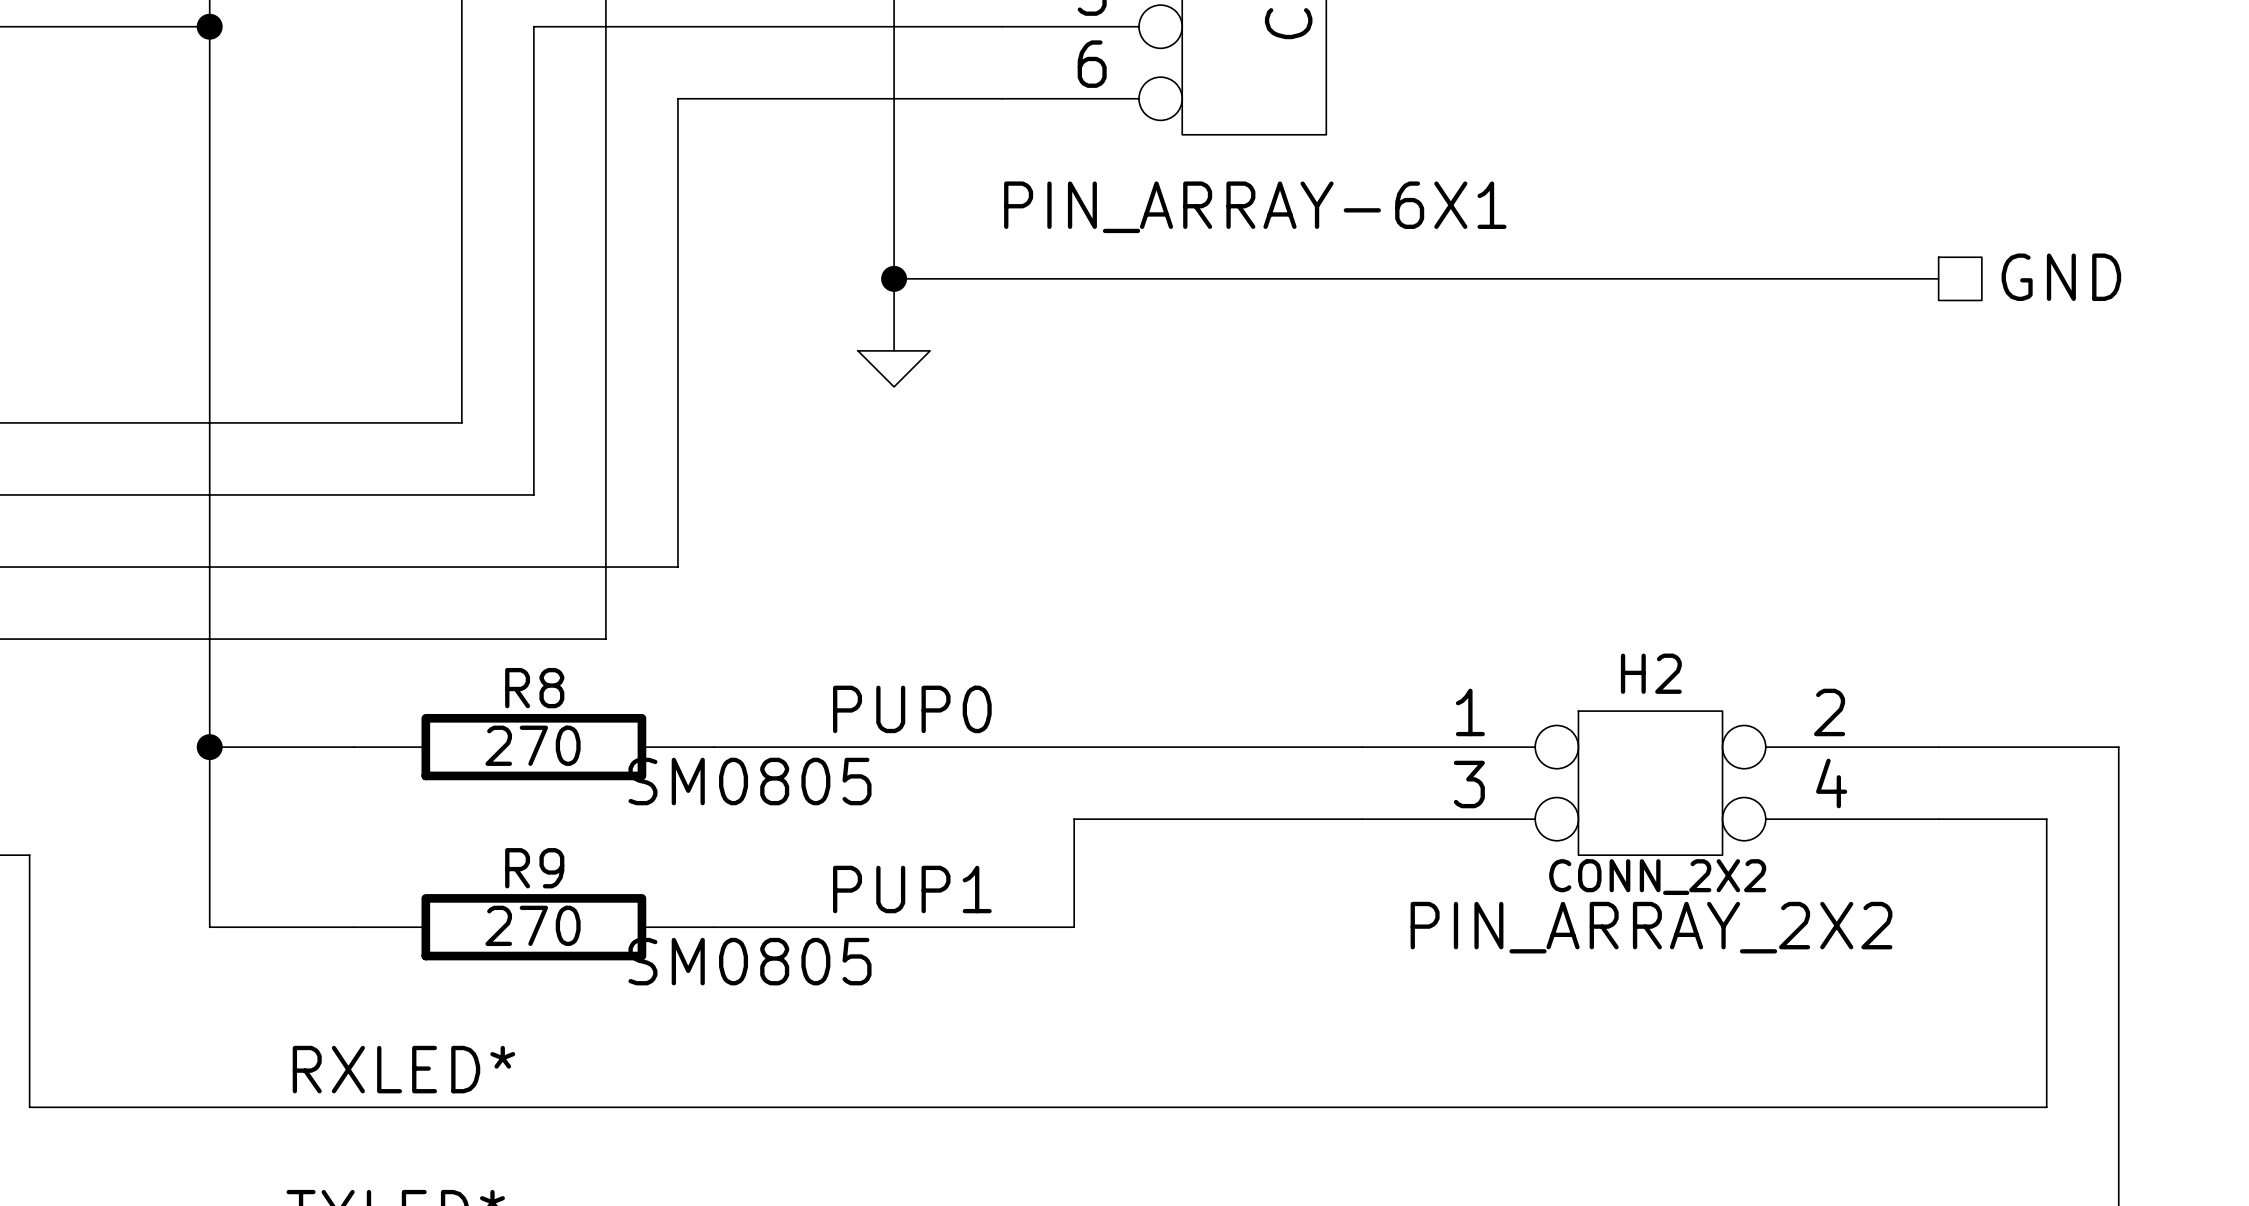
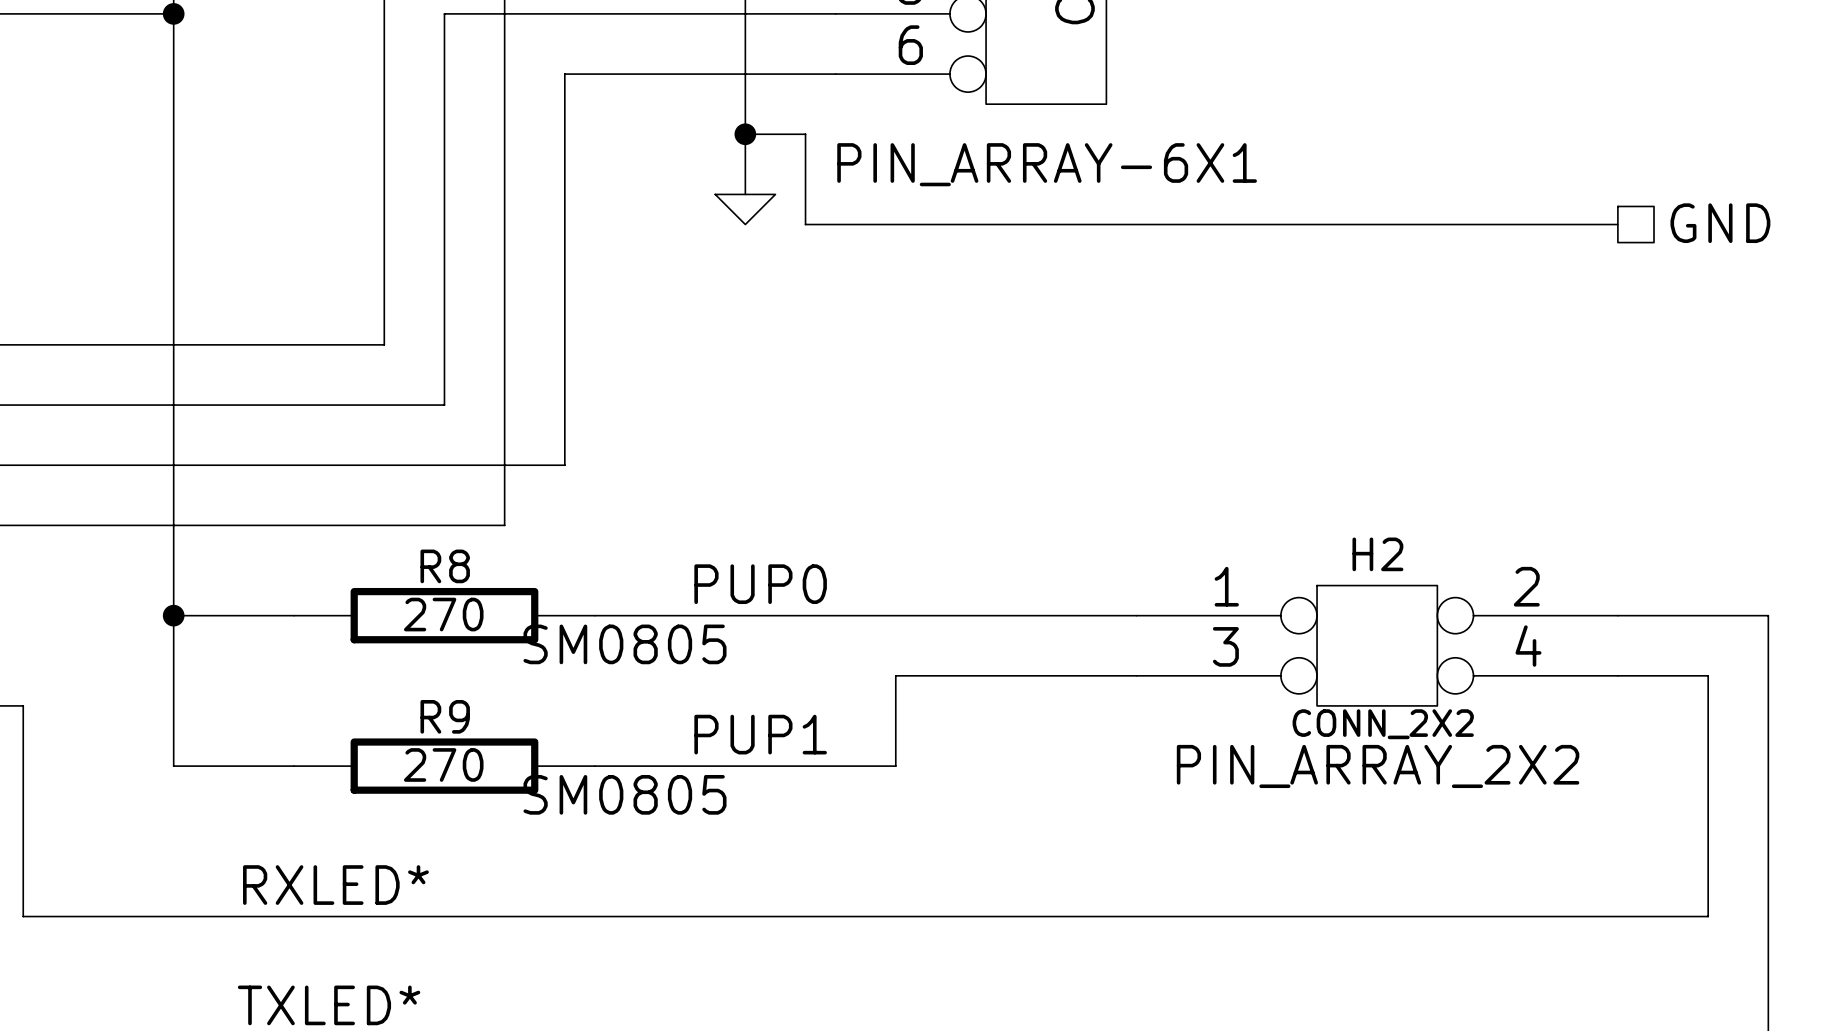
wire: (894, 242) (894, 350) -> none
wire: (894, 278) (966, 278) -> (745, 134) (805, 134) (805, 224)
junction position: (894, 278) -> (745, 134)
power symbol position: (894, 368) -> (745, 209)

